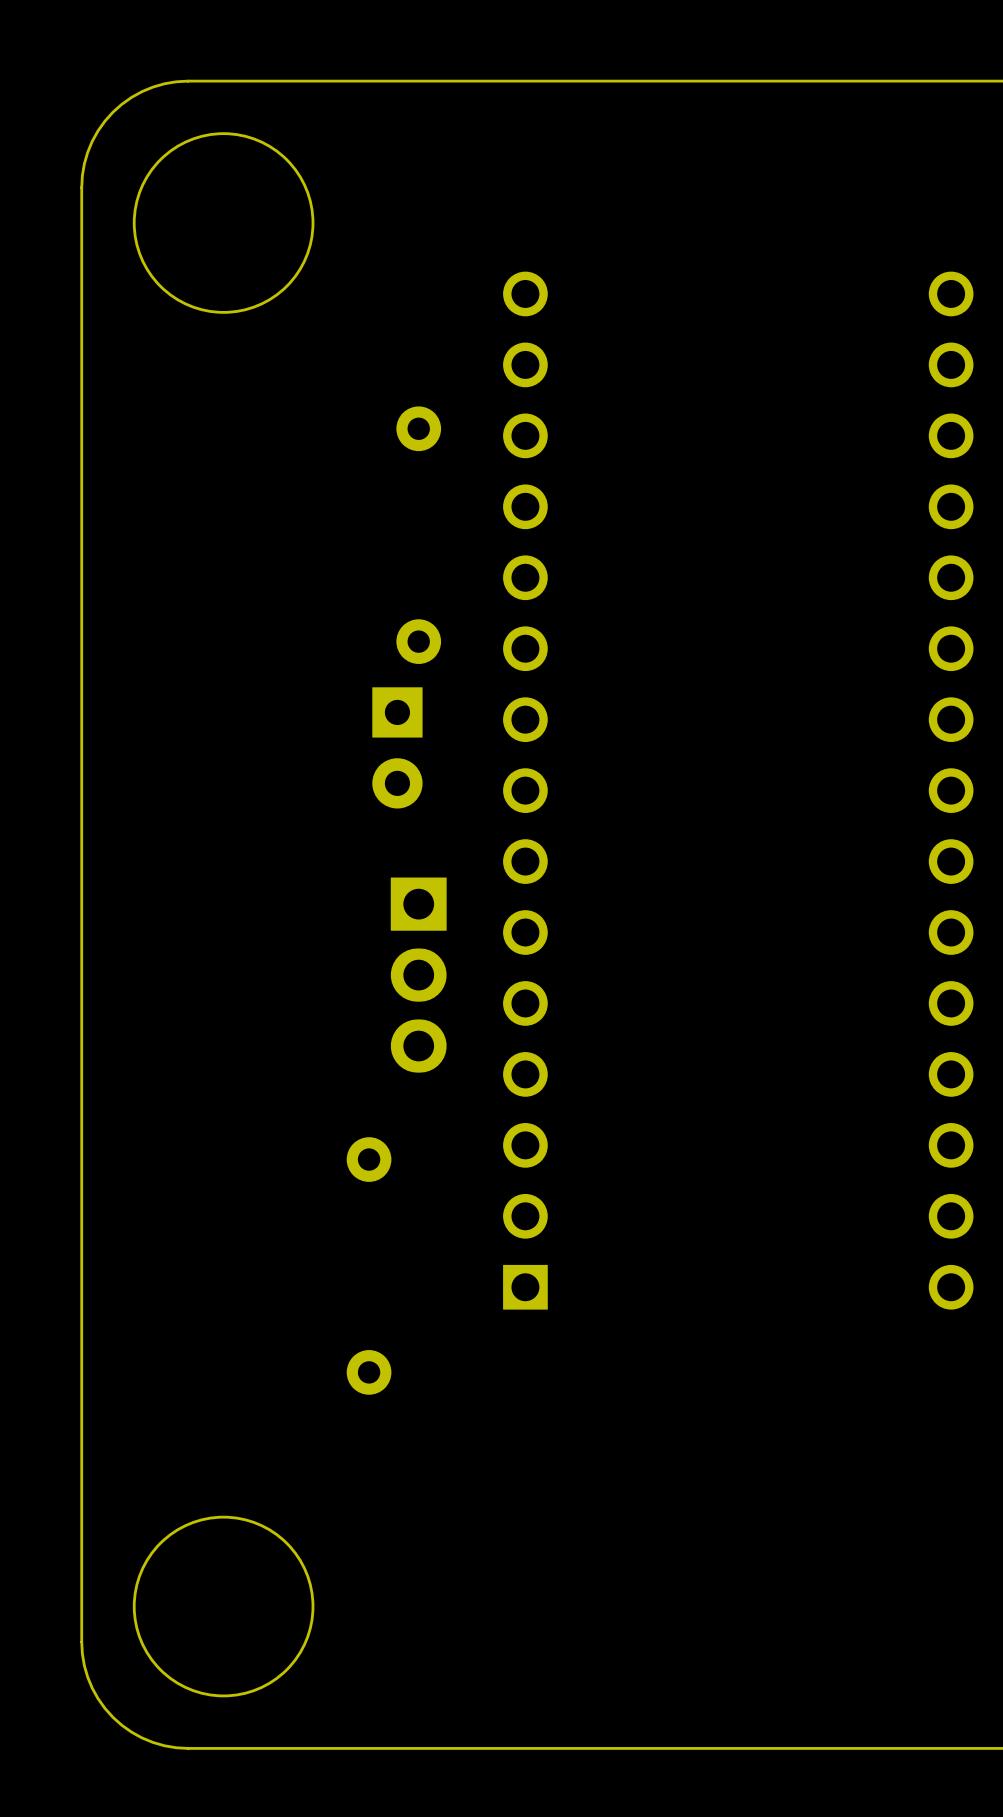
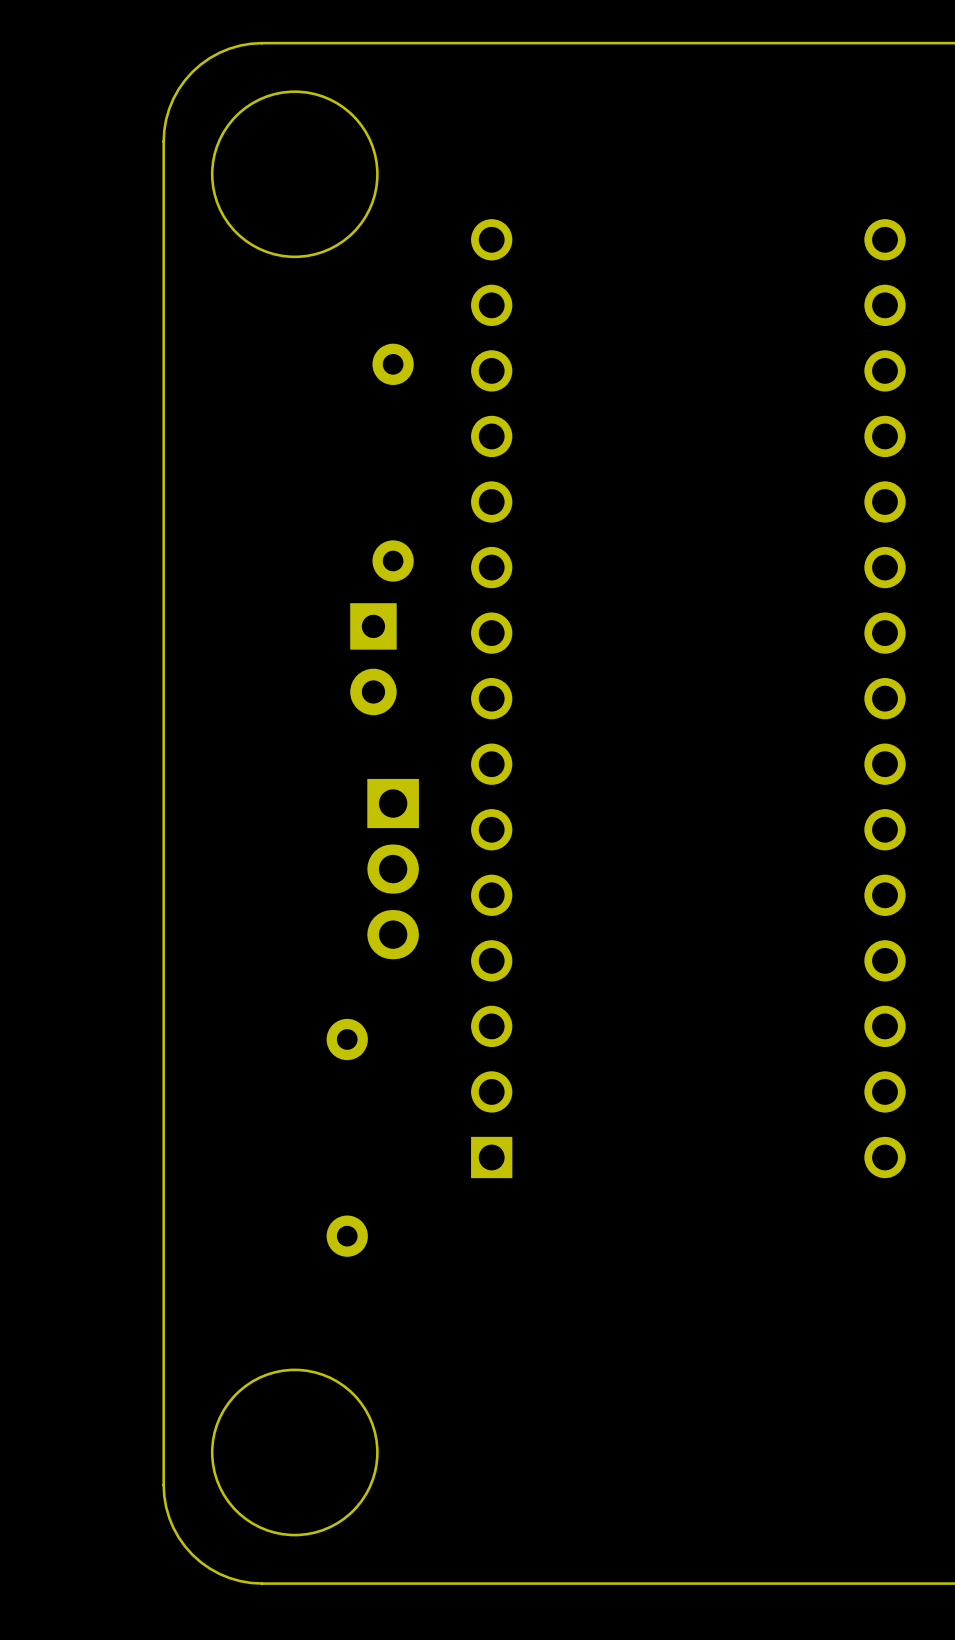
board edge: (276, 81) (176, 81) (141, 91) (121, 104) (98, 130) (87, 152) (81, 187) -> none
board edge: (81, 187) (82, 1653) (87, 1677) (98, 1698) (121, 1725) (141, 1737) (176, 1747) (276, 1748) -> (262, 43) (229, 48) (209, 58) (192, 71) (178, 89) (169, 108) (163, 141) (164, 1496) (173, 1527) (185, 1546) (200, 1562) (229, 1578) (262, 1583)
round board edge position: (223, 223) -> (294, 174)
round board edge position: (223, 1606) -> (294, 1452)

